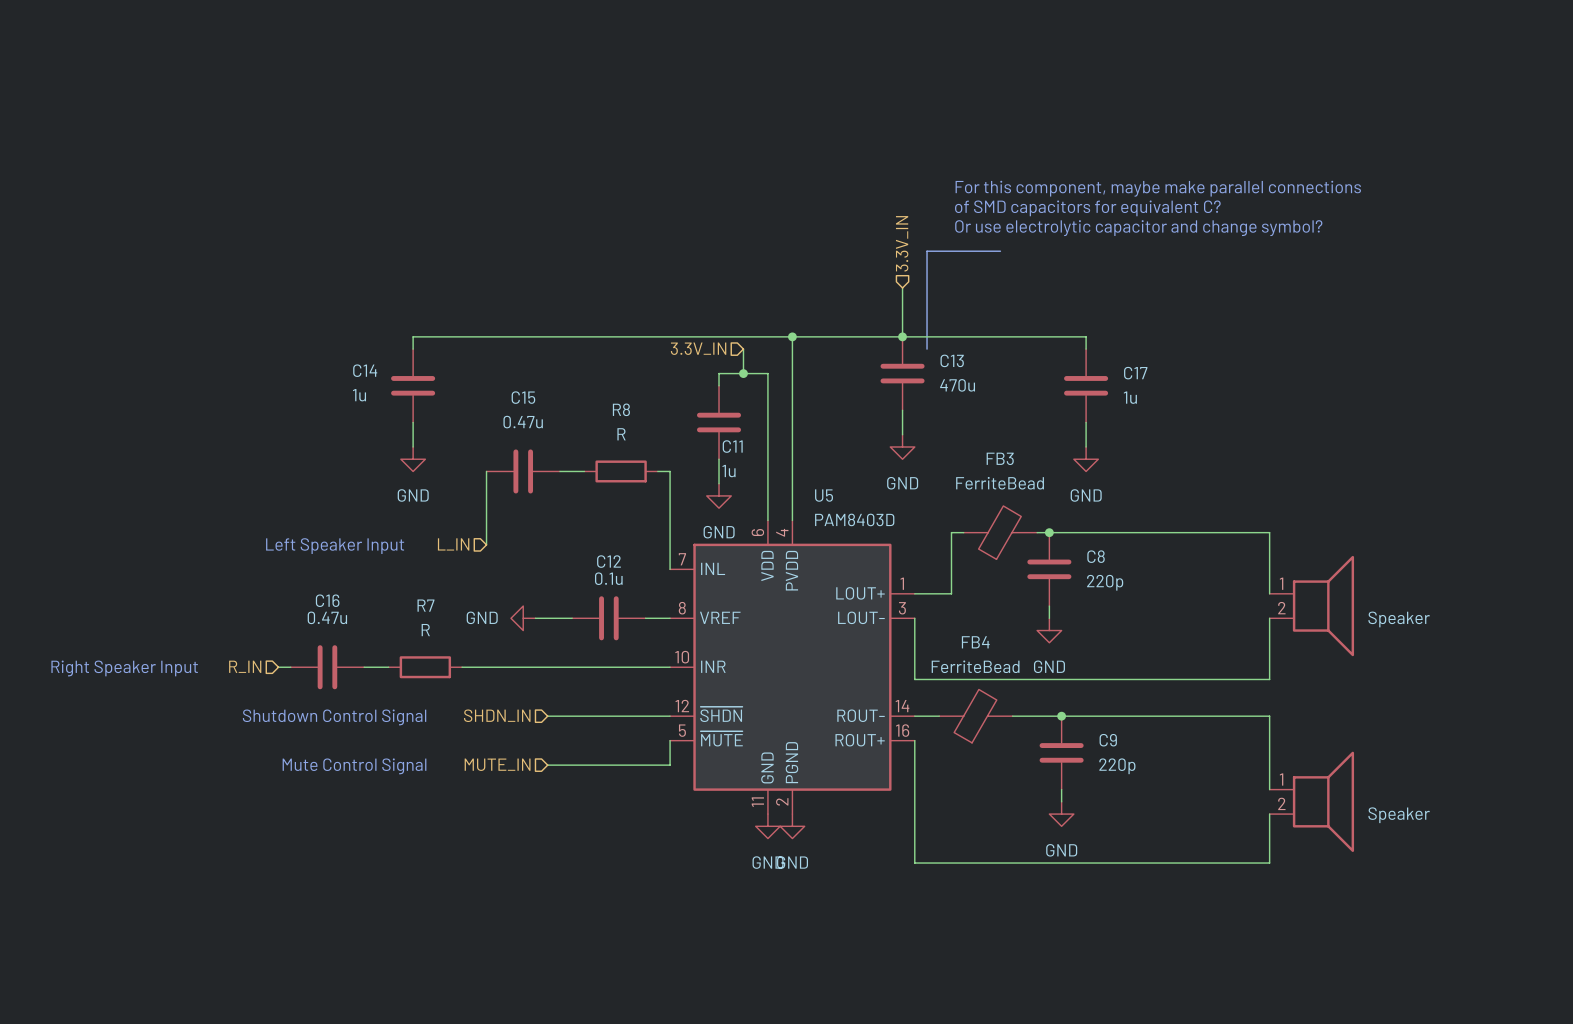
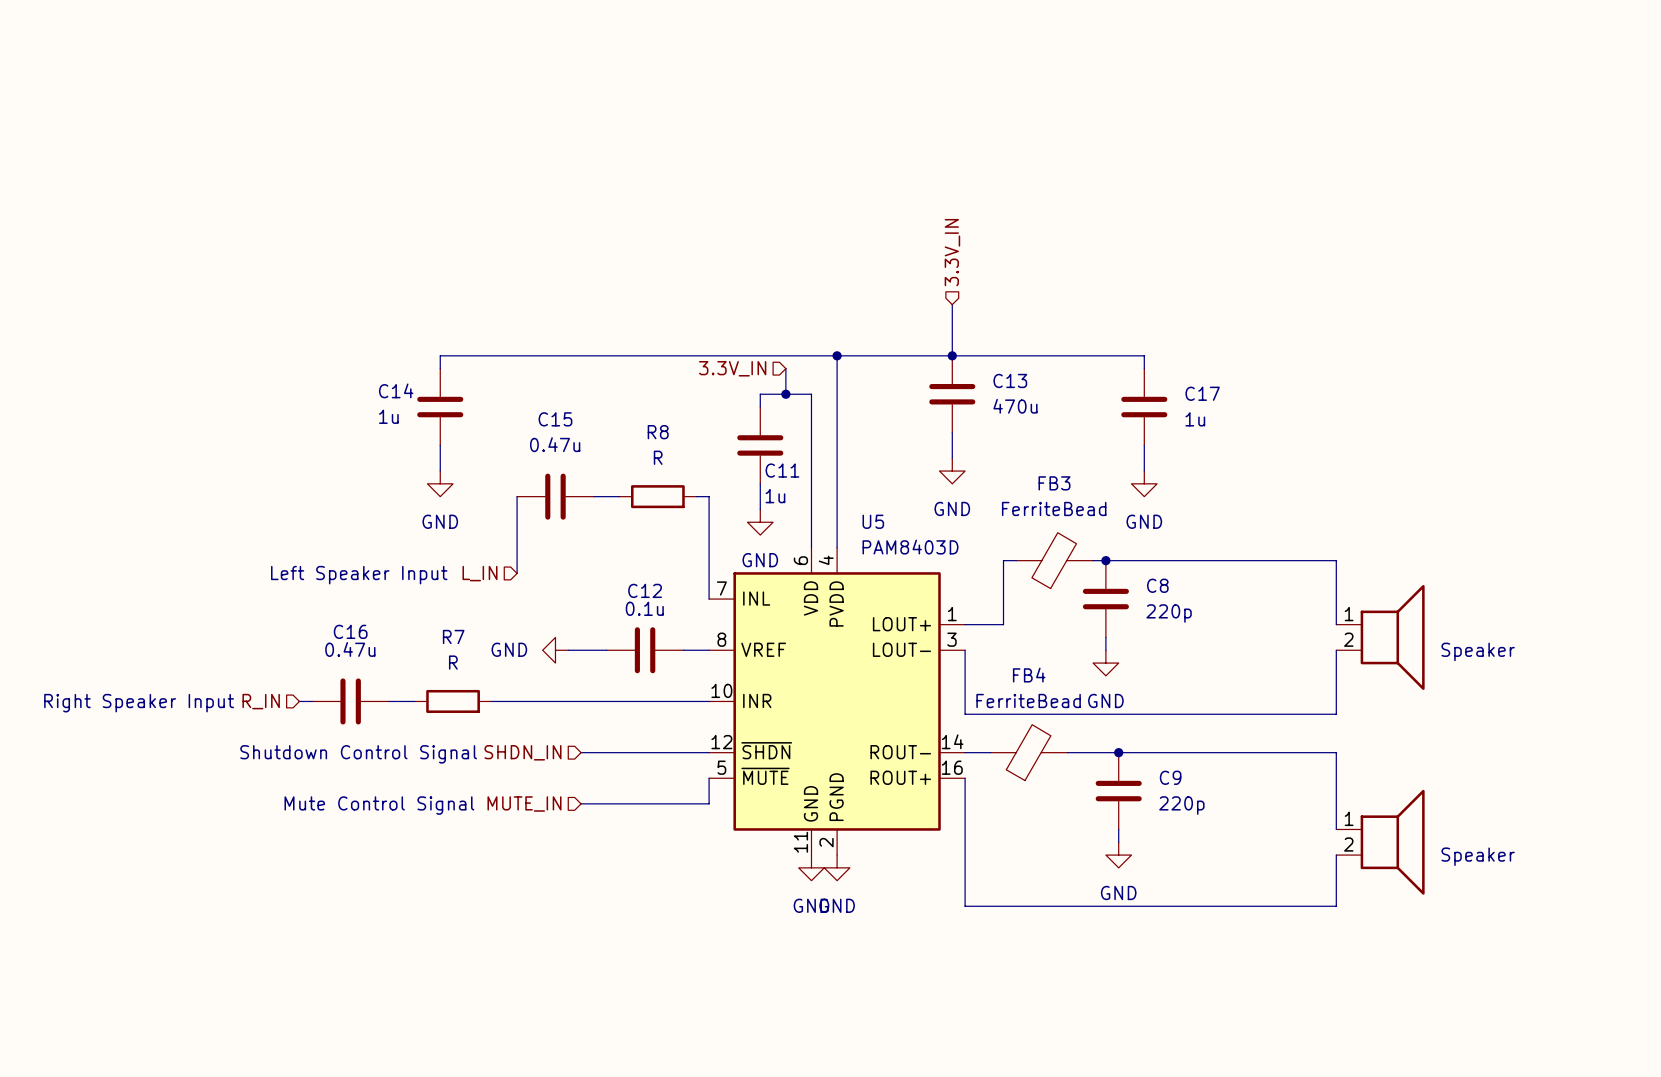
text: For this component, maybe make parallel connections (1158, 188) -> none
text: of SMD capacitors for equivalent C? (1087, 208) -> none
text: Or use electrolytic capacitor and change symbol? (1138, 228) -> none
line: (1000, 251) (927, 251) (927, 349) -> none

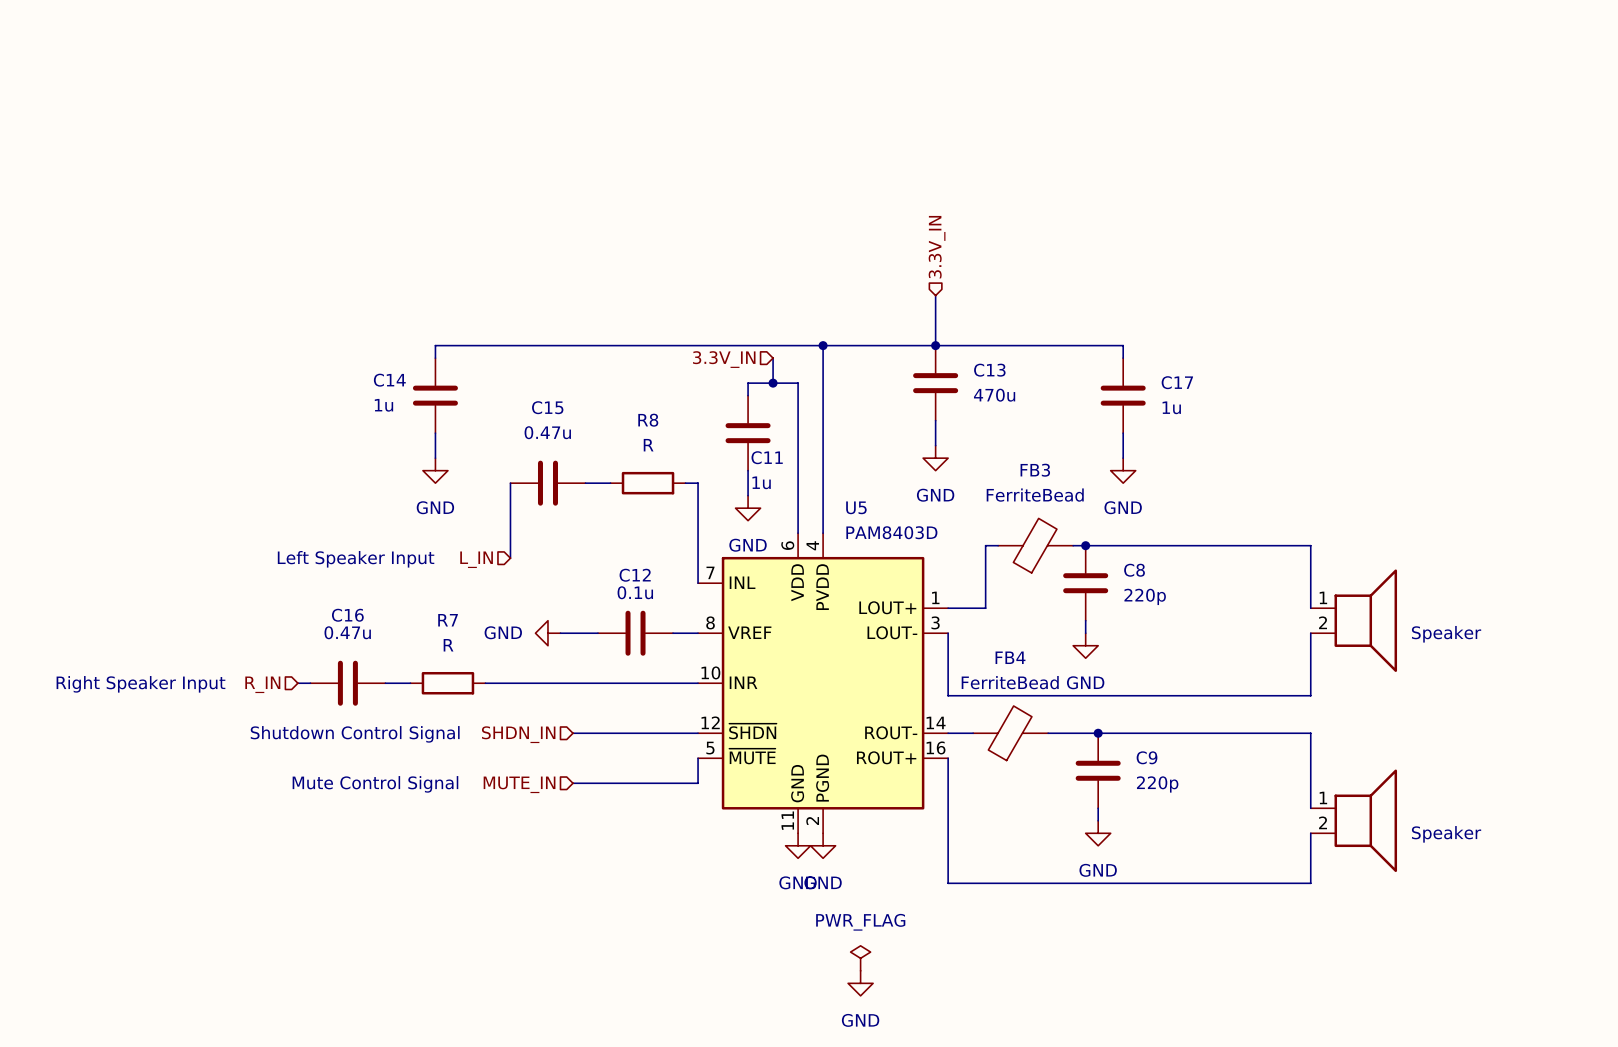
power symbol: none -> PWR_FLAG (860, 958)
power symbol: none -> GND (860, 983)

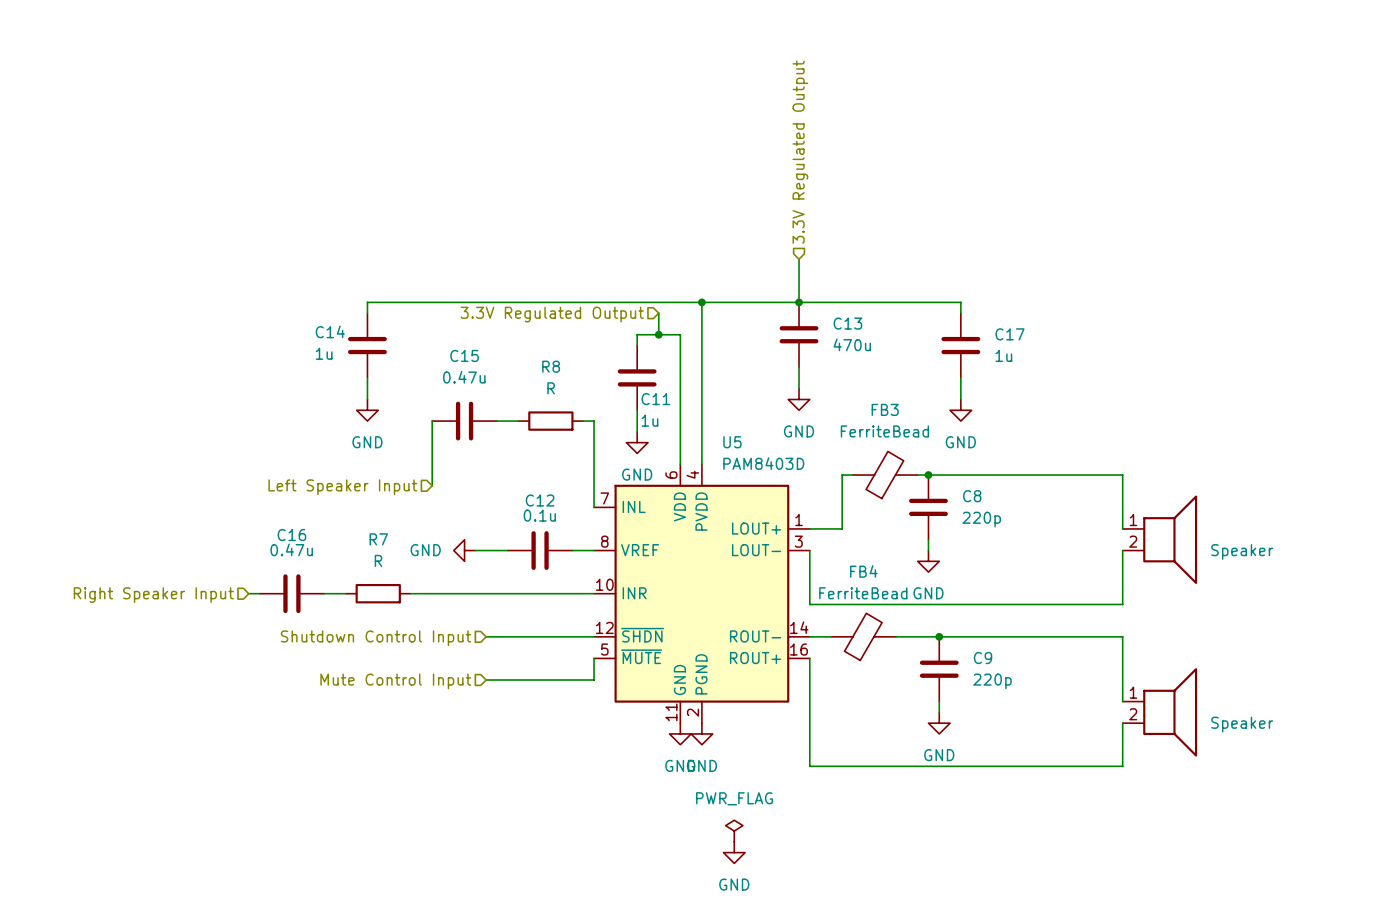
hierarchical label: 3.3V_IN (937, 247) -> 3.3V Regulated Output (800, 152)
hierarchical label: 3.3V_IN (724, 359) -> 3.3V Regulated Output (552, 314)
text: Left Speaker Input (356, 559) -> none
hierarchical label: L_IN (476, 559) -> Left Speaker Input (342, 487)
text: Right Speaker Input (140, 684) -> none
hierarchical label: R_IN (262, 684) -> Right Speaker Input (153, 595)
text: Shutdown Control Signal (355, 734) -> none
hierarchical label: SHDN_IN (518, 734) -> Shutdown Control Input (376, 638)
text: Mute Control Signal (375, 784) -> none
hierarchical label: MUTE_IN (519, 784) -> Mute Control Input (395, 681)

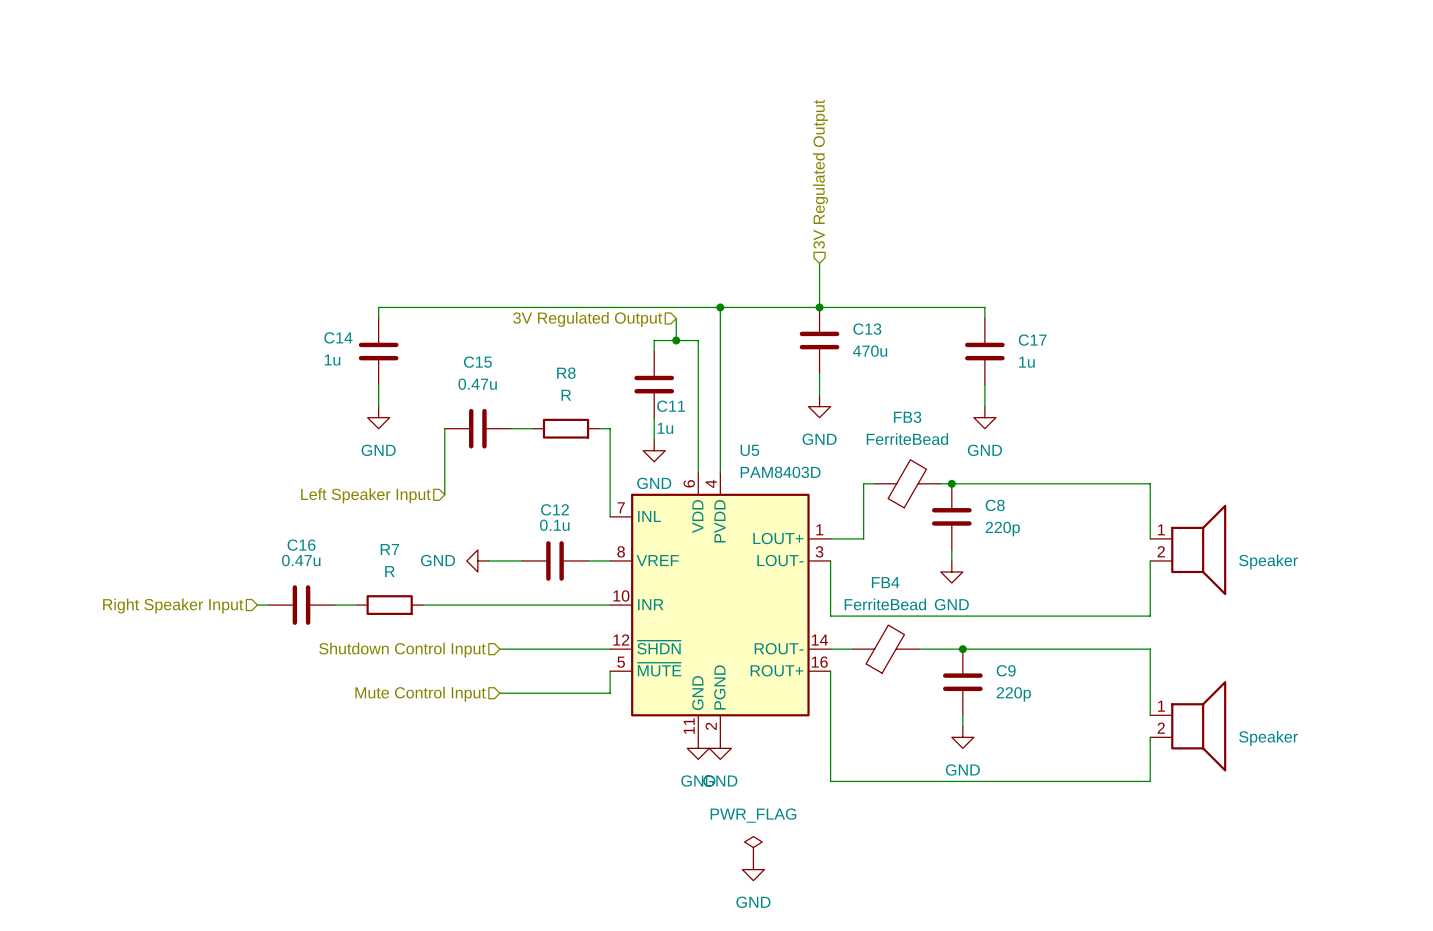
hierarchical label: 3.3V Regulated Output (800, 152) -> 3V Regulated Output (820, 174)
hierarchical label: 3.3V Regulated Output (552, 314) -> 3V Regulated Output (587, 319)

